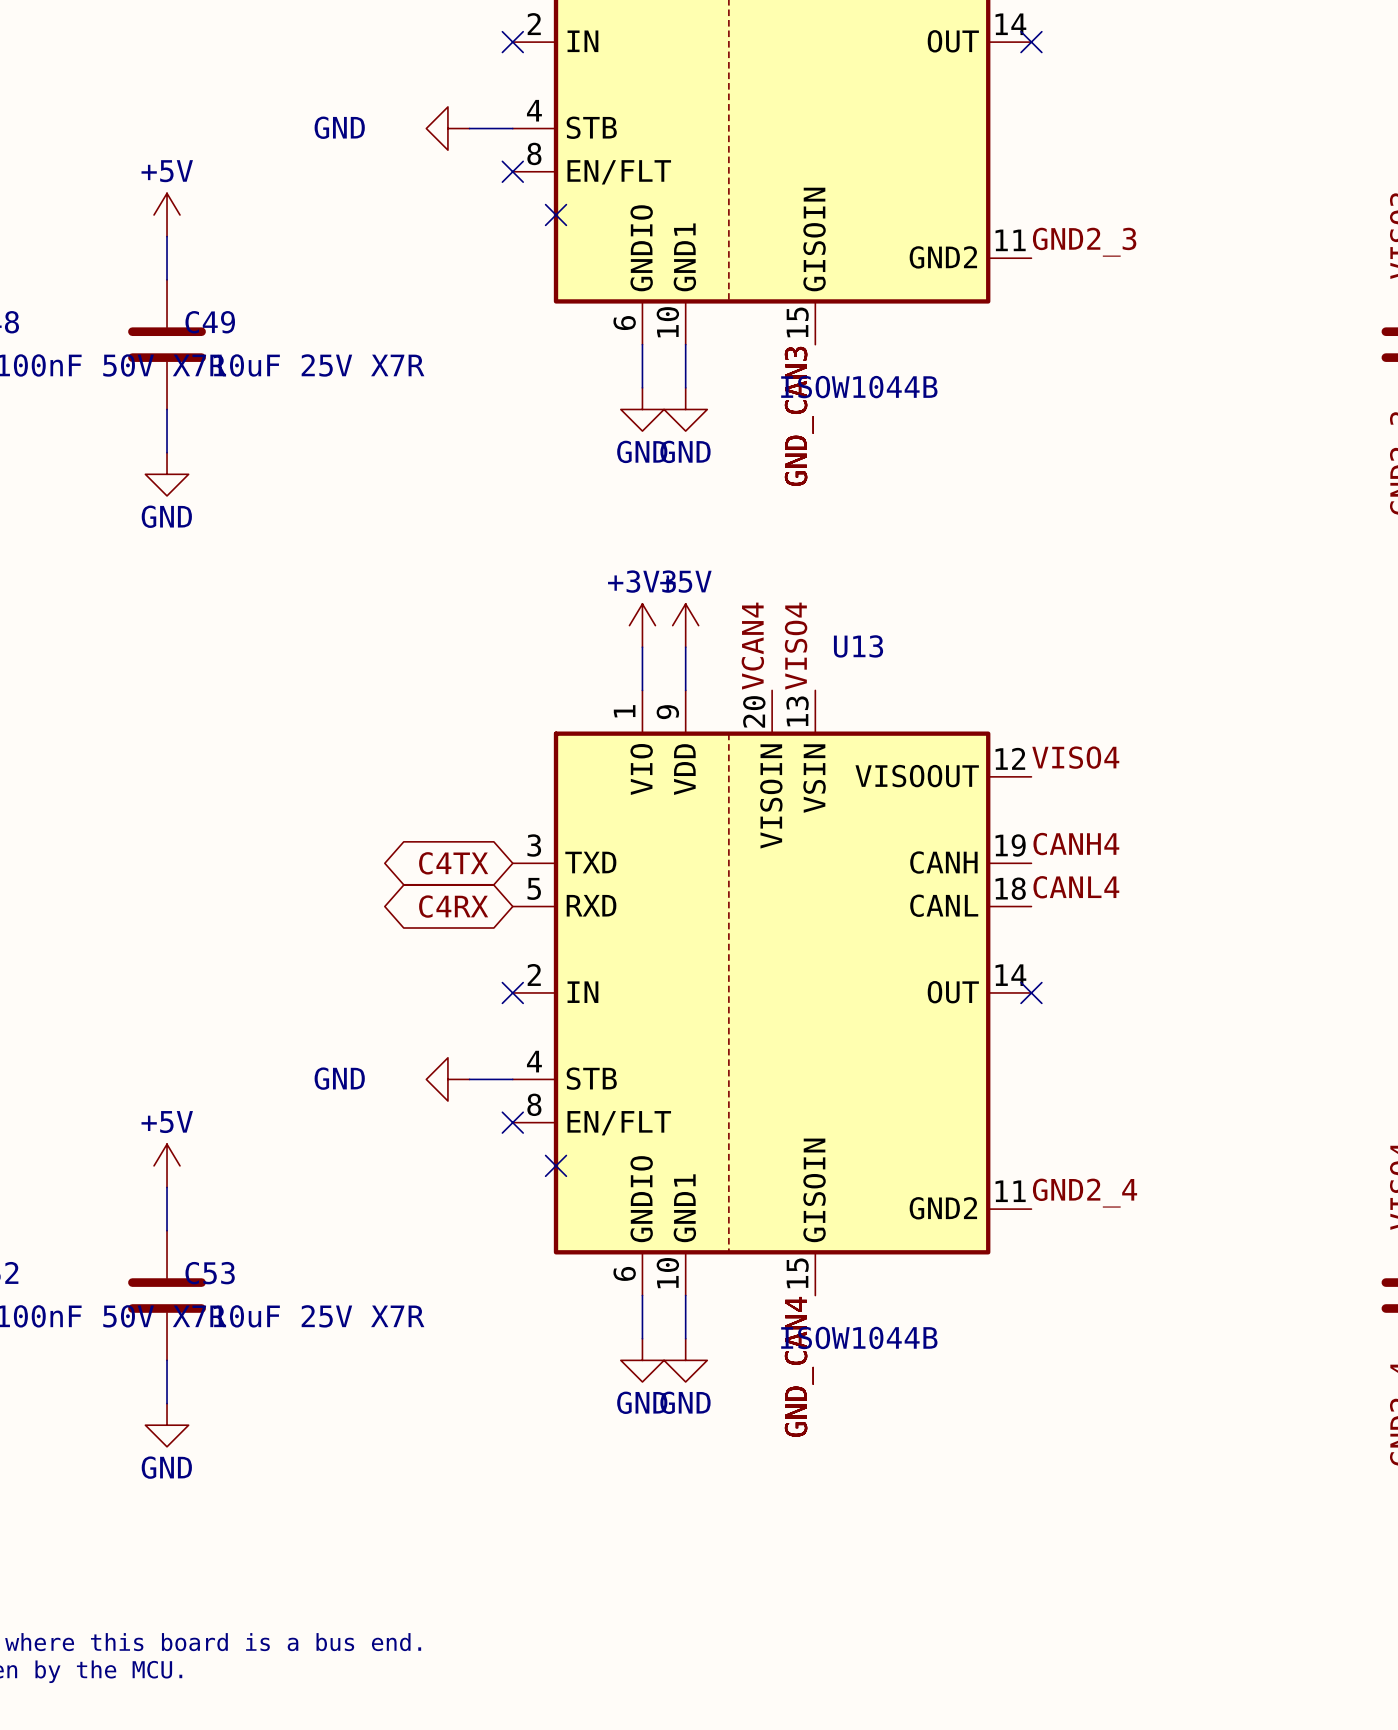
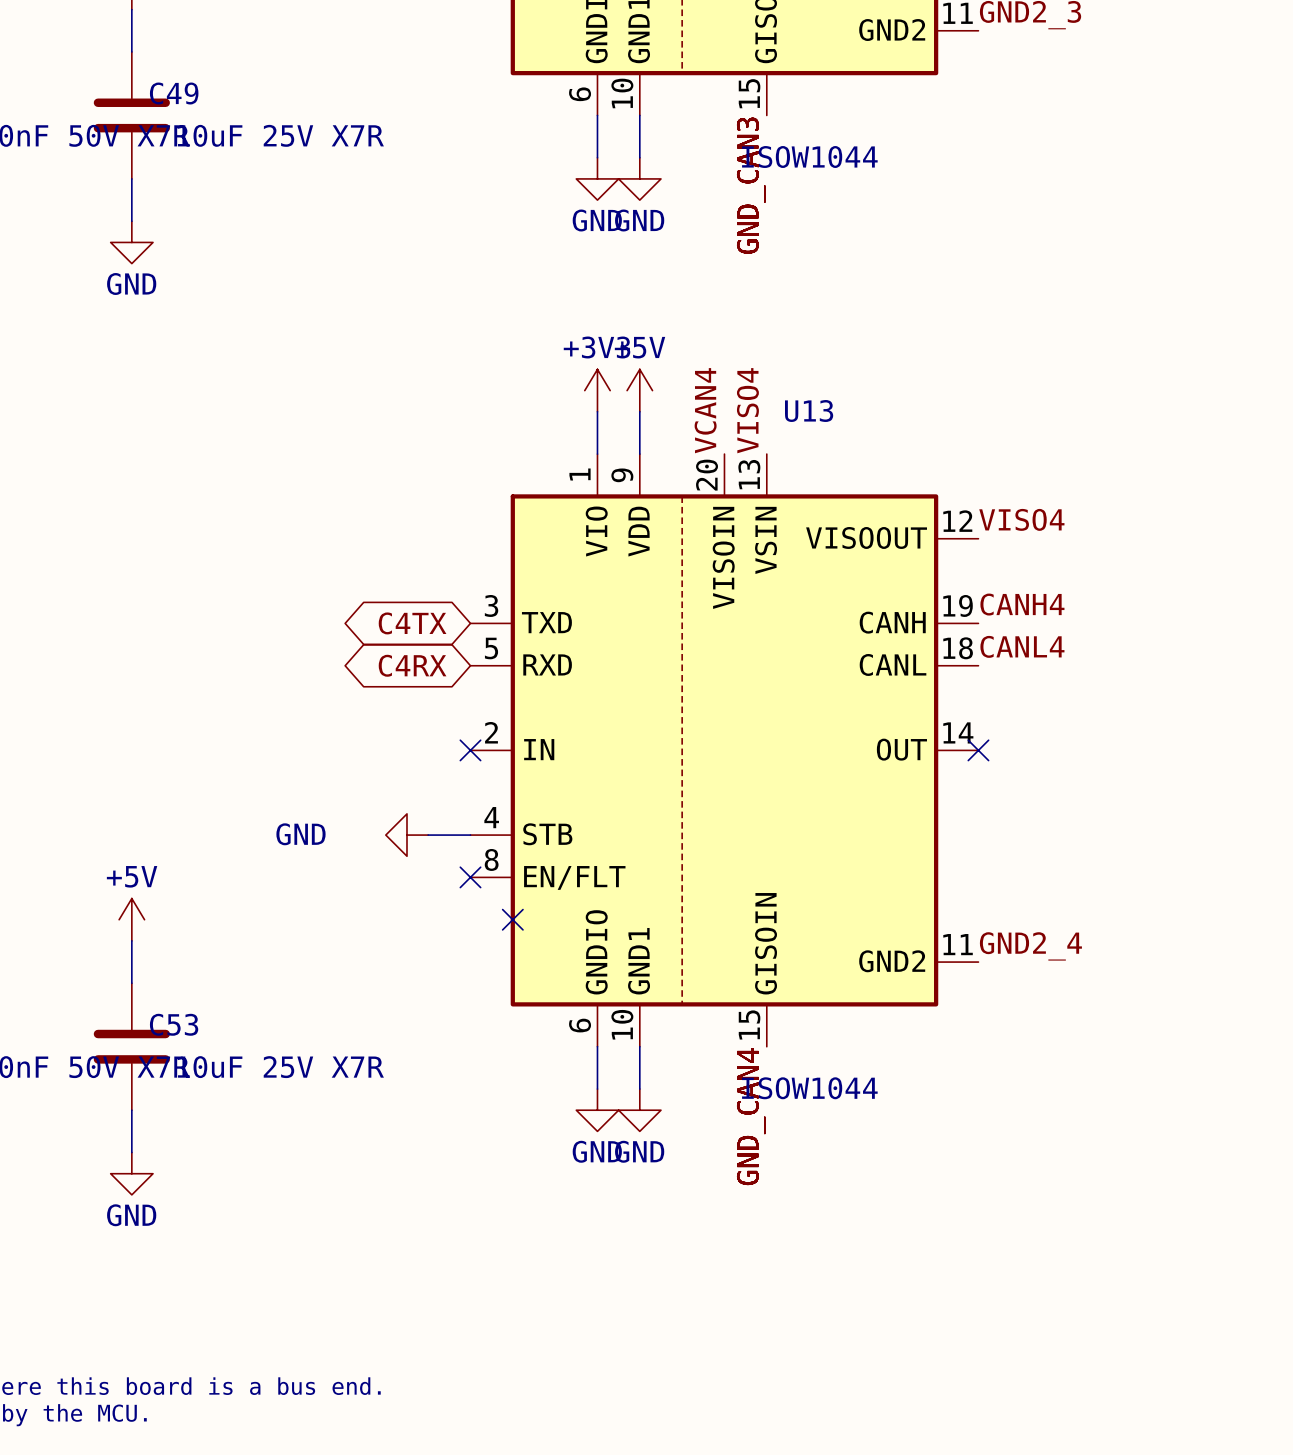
part value: ISOW1044B (859, 387) -> ISOW1044 (809, 157)
U13 value: ISOW1044B (859, 1337) -> ISOW1044 (809, 1088)

